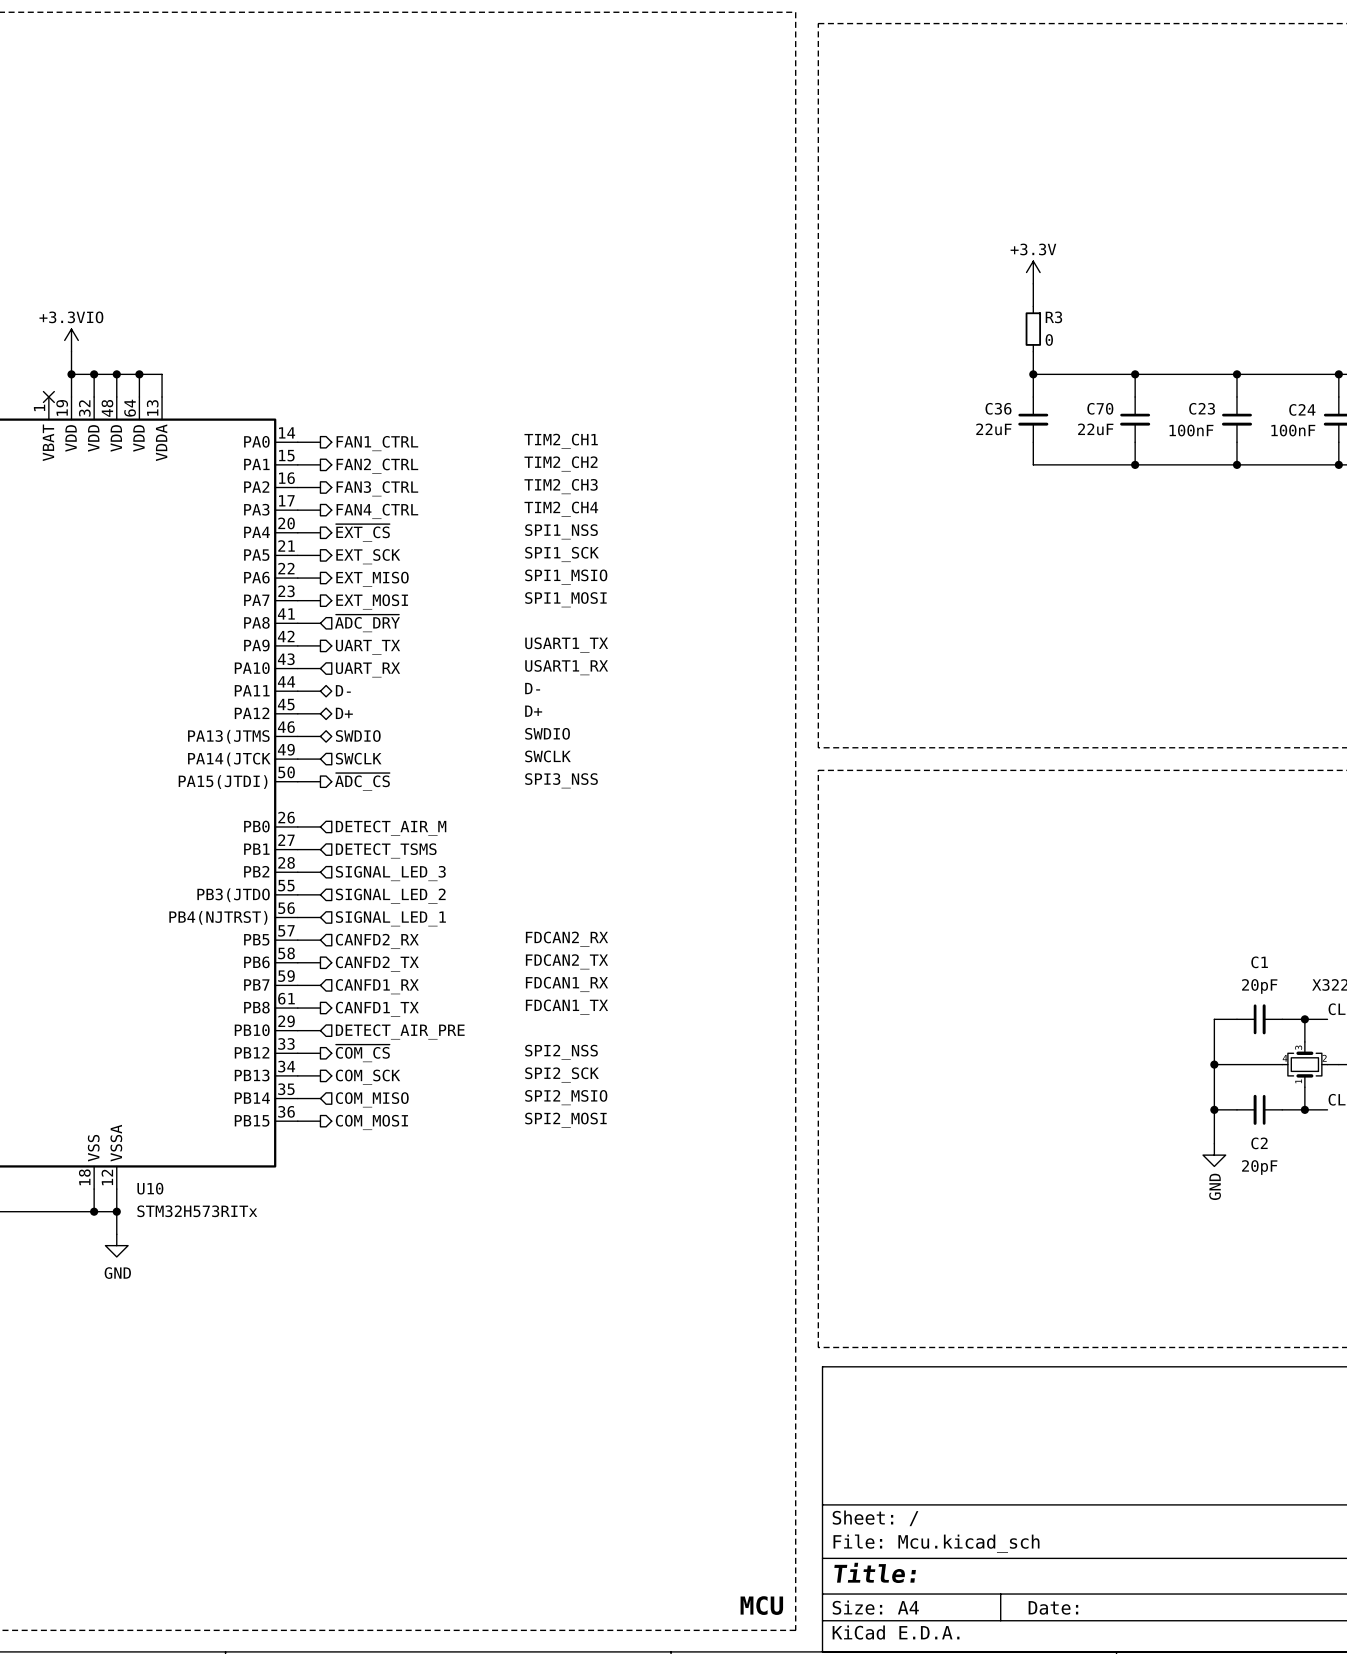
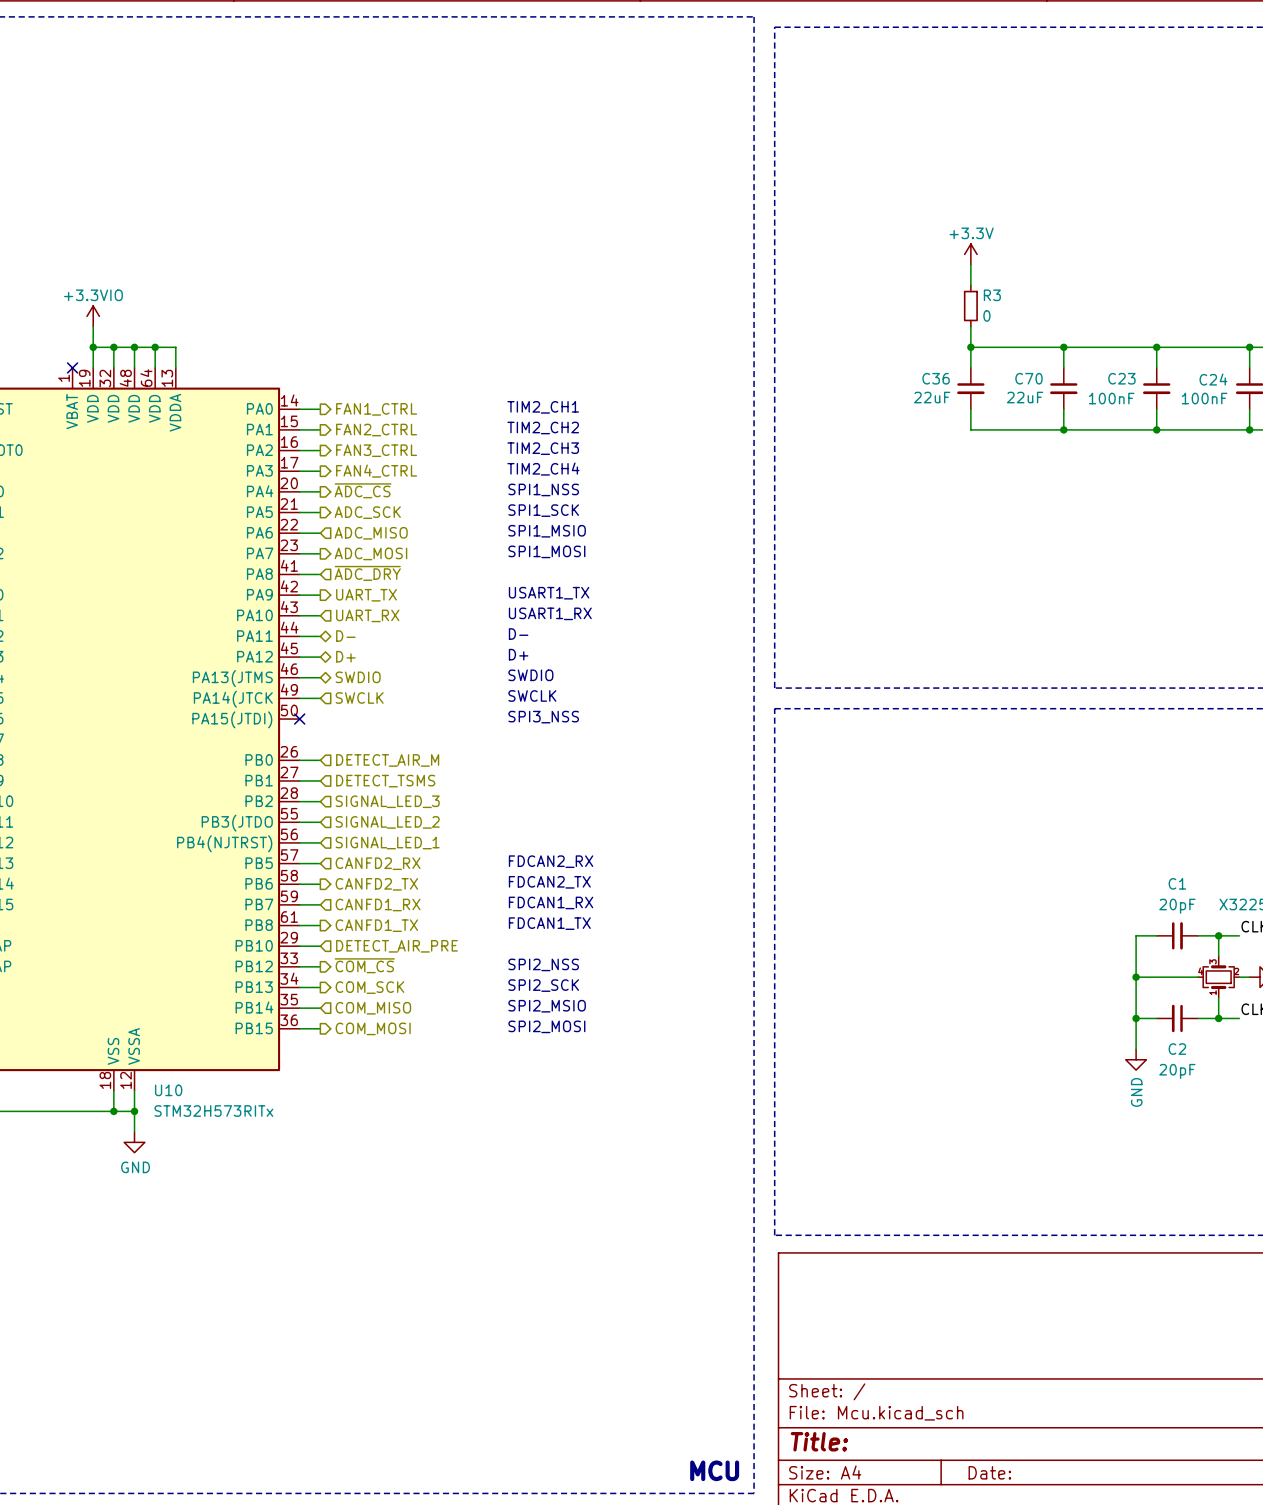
hierarchical label: ~{EXT_CS} (362, 532) -> ~{ADC_CS} (363, 490)
hierarchical label: EXT_SCK (368, 556) -> ADC_SCK (367, 512)
hierarchical label shape: output (372, 579) -> input (371, 533)
hierarchical label: EXT_MISO (372, 579) -> ADC_MISO (371, 533)
hierarchical label: EXT_MOSI (372, 601) -> ADC_MOSI (370, 553)
wire: (297, 781) (320, 781) -> none
no-connect mark: none -> (299, 719)
hierarchical label: ~{ADC_CS} (362, 781) -> none

